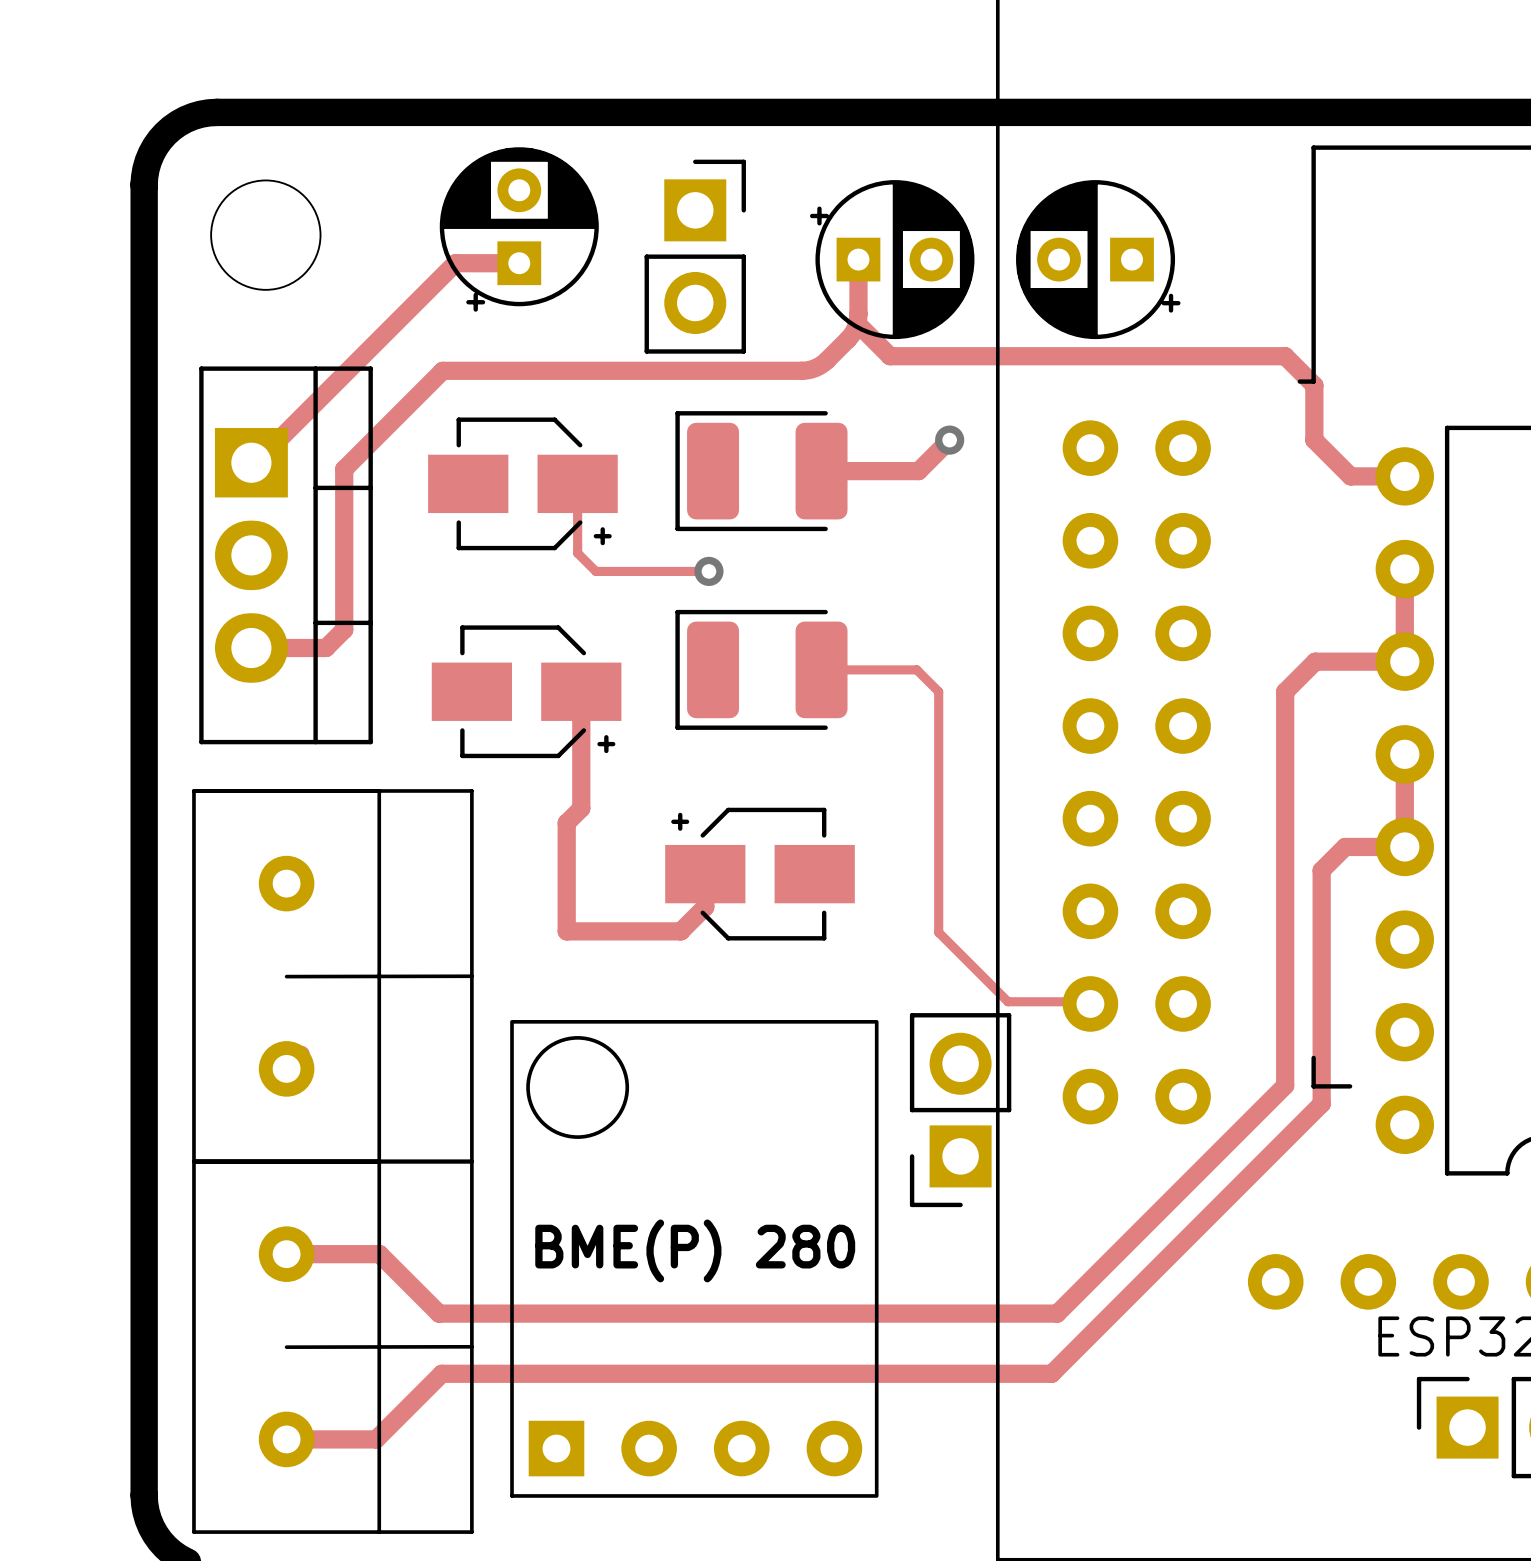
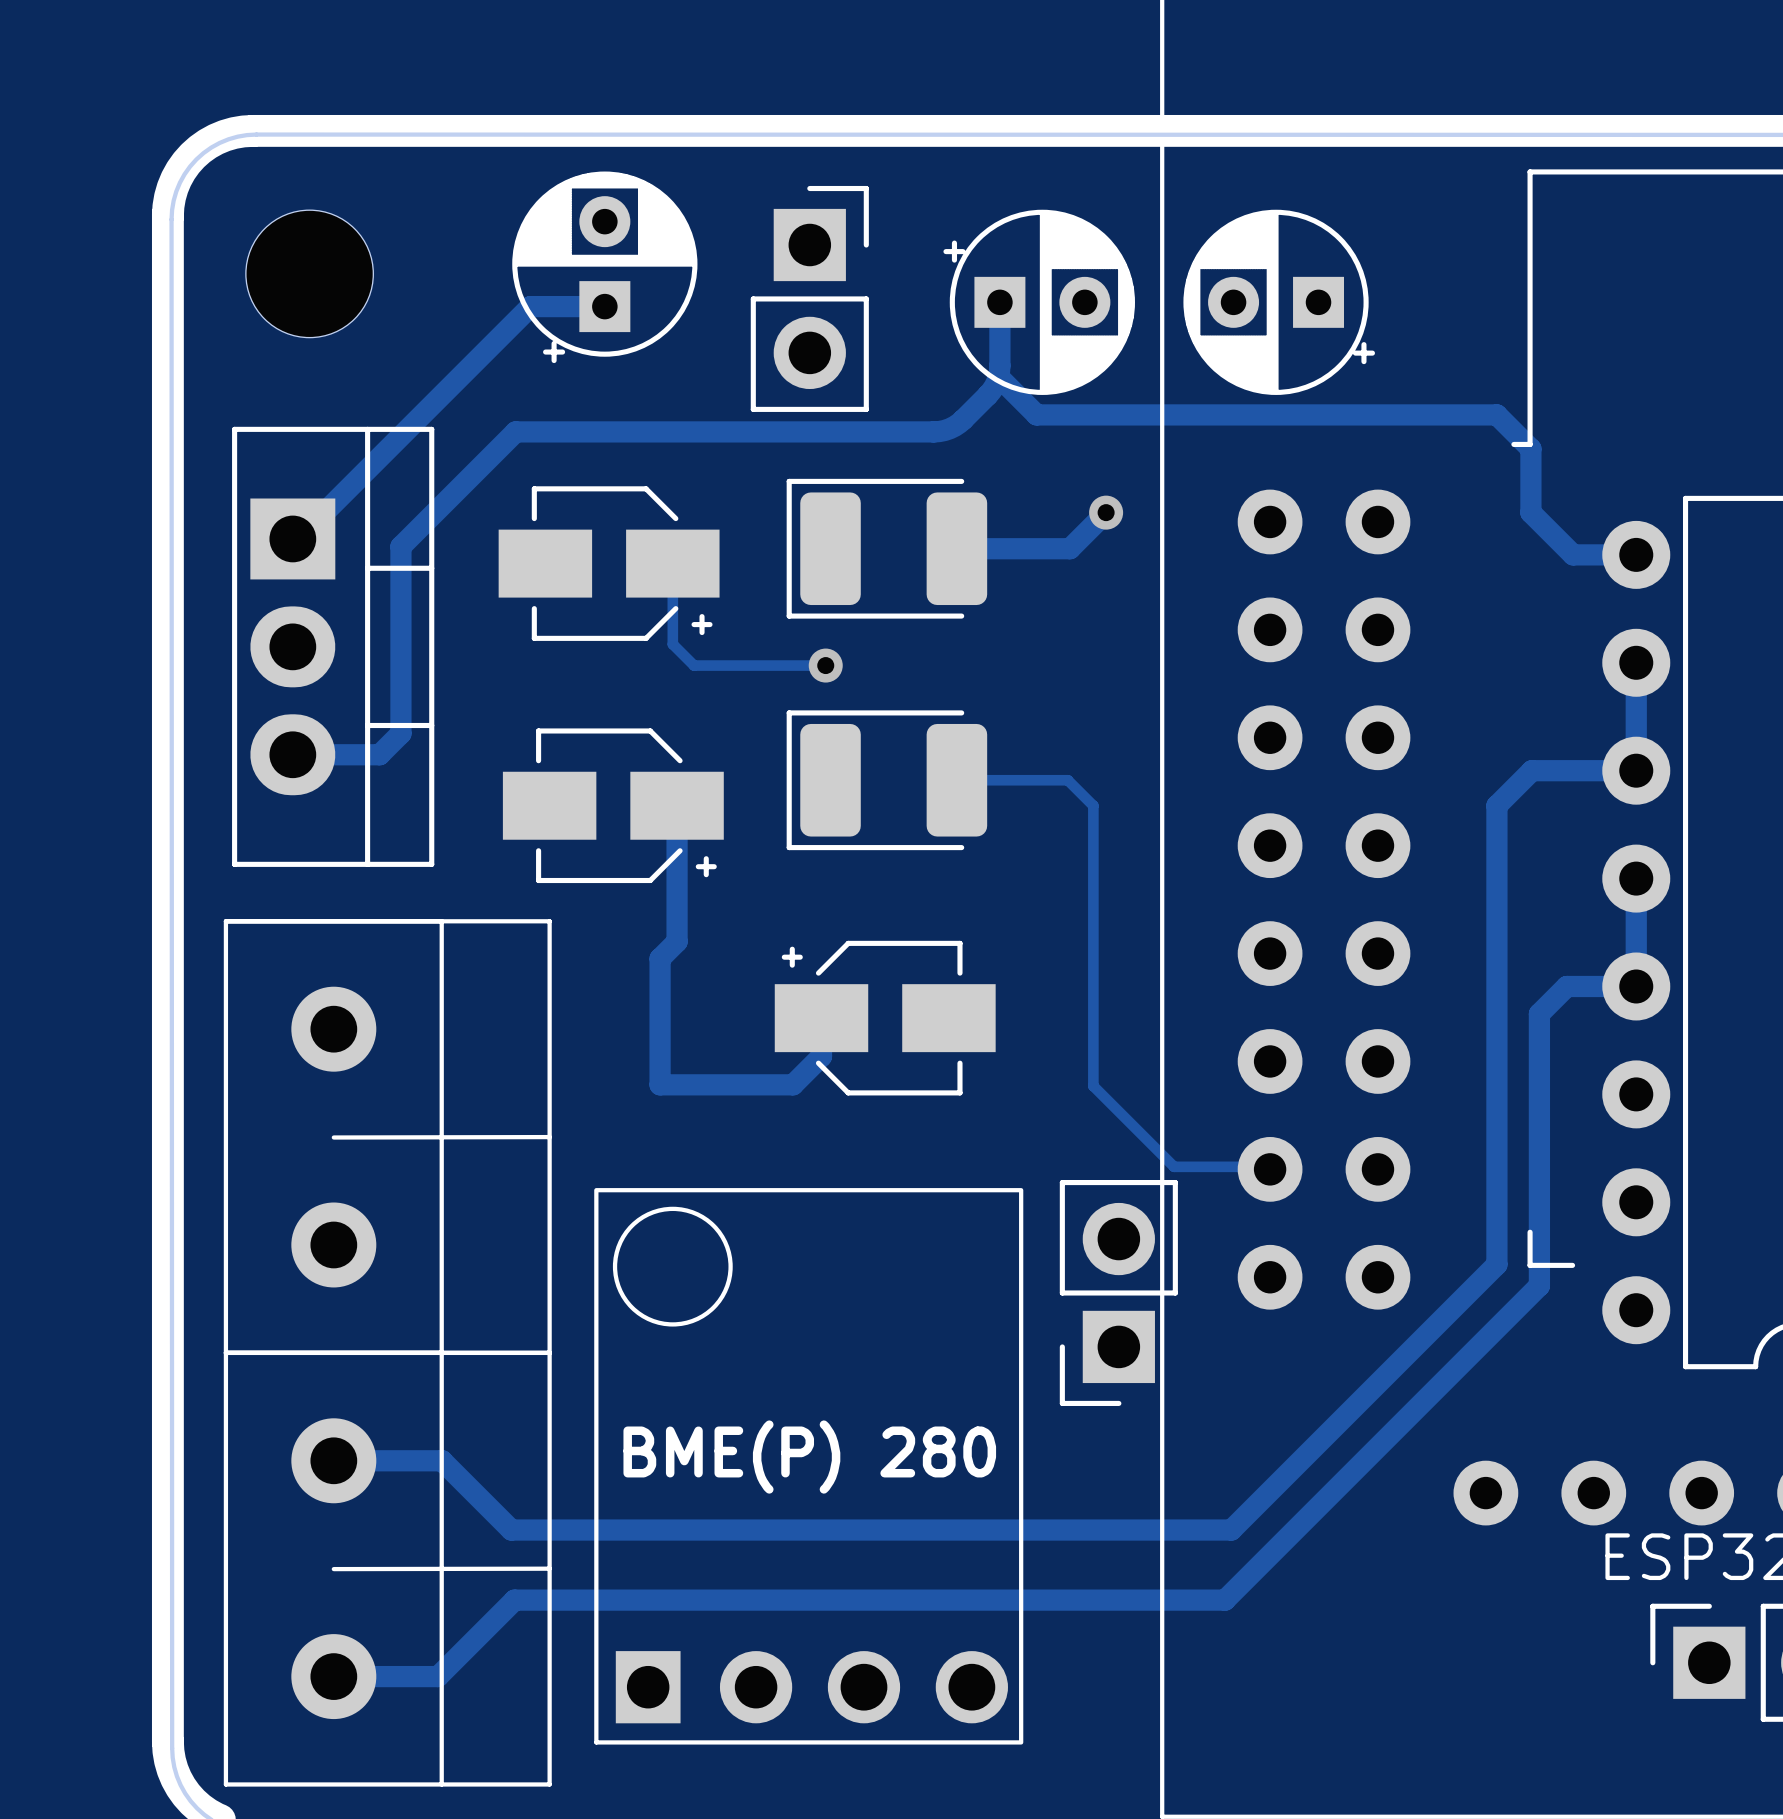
part footprint: [192, 789, 474, 1164] -> [223, 919, 552, 1356]
part footprint: [510, 1020, 879, 1498] -> [594, 1188, 1024, 1745]
part footprint: [192, 1159, 474, 1534] -> [223, 1350, 552, 1787]

